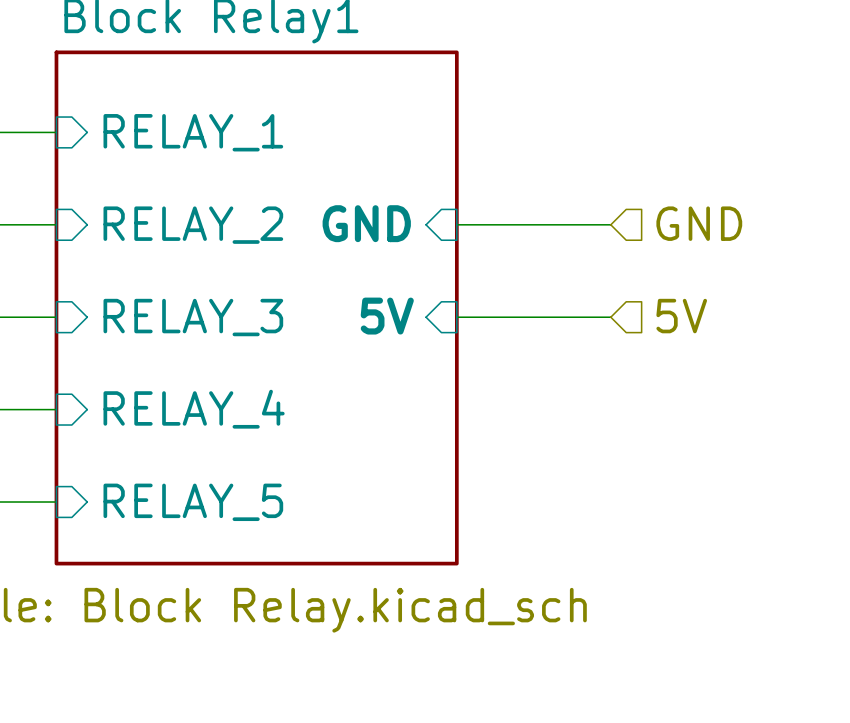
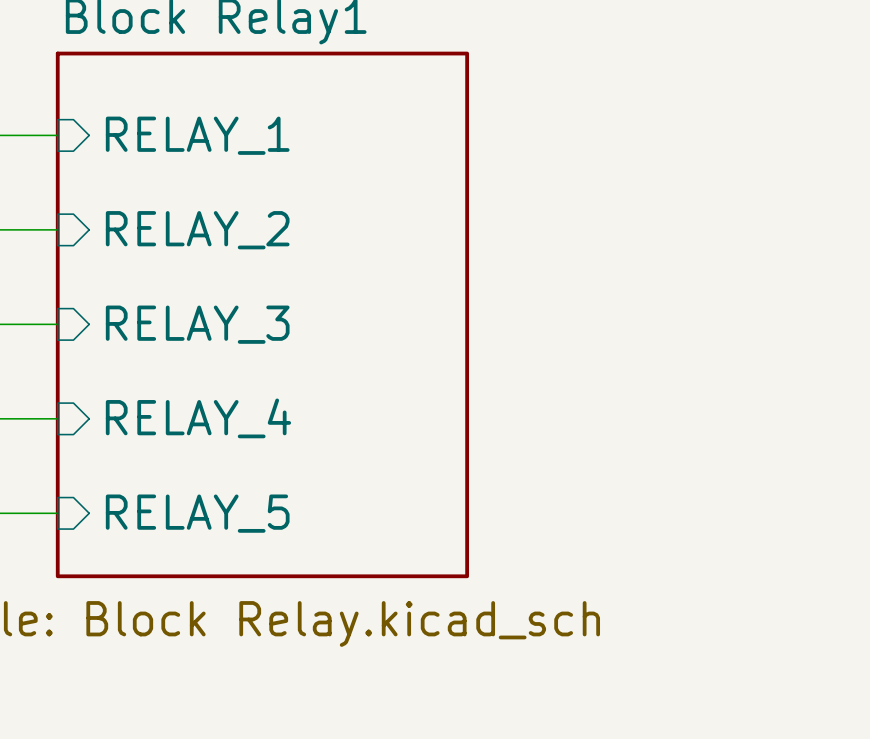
sheet pin: GND (366, 223) -> none
hierarchical label: GND (699, 223) -> none
wire: (456, 224) (610, 224) -> none
sheet pin: 5V (387, 316) -> none
hierarchical label: 5V (681, 316) -> none
wire: (456, 317) (610, 317) -> none

